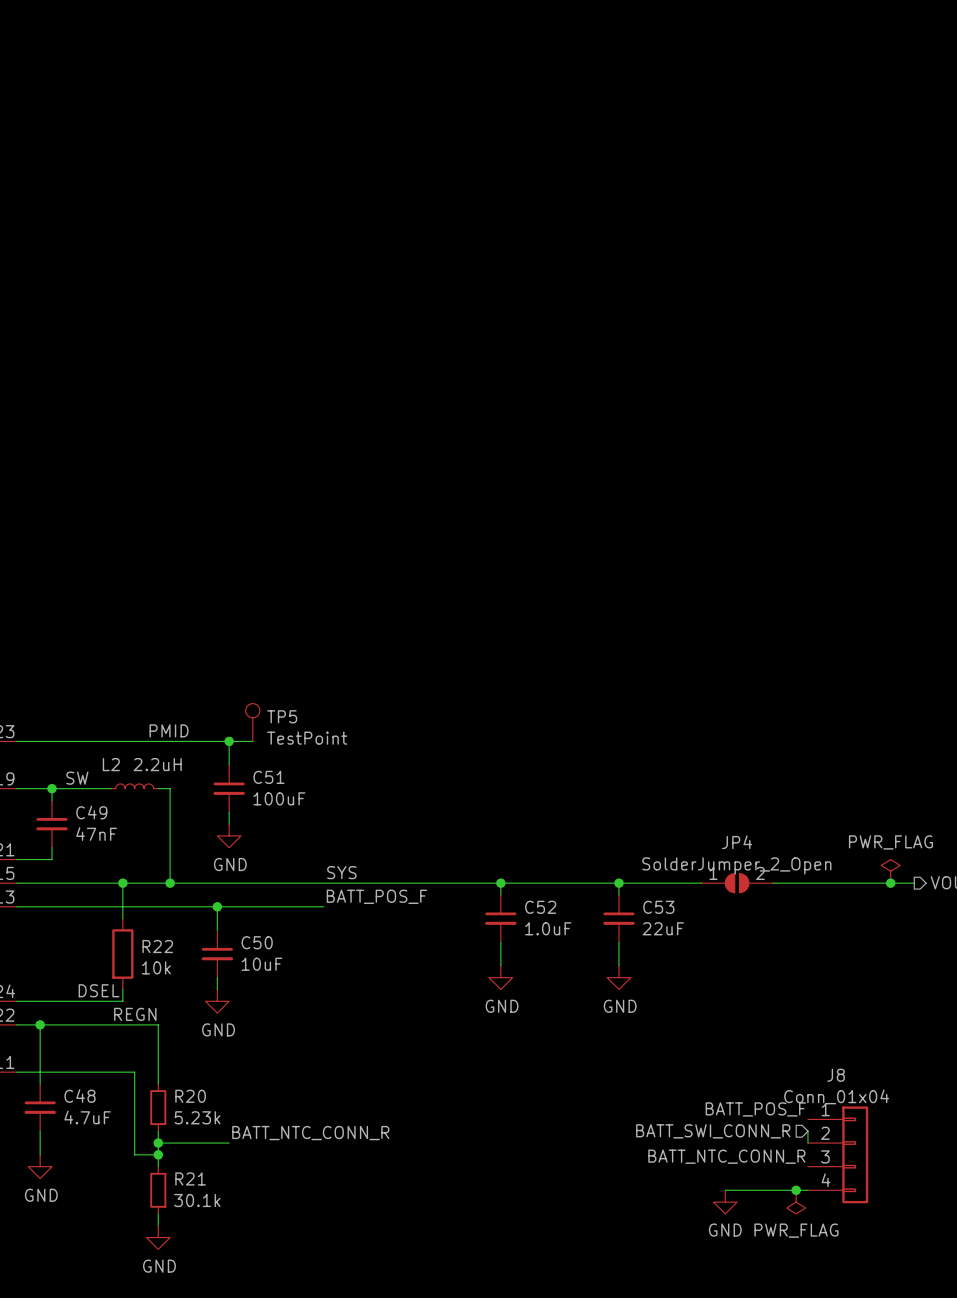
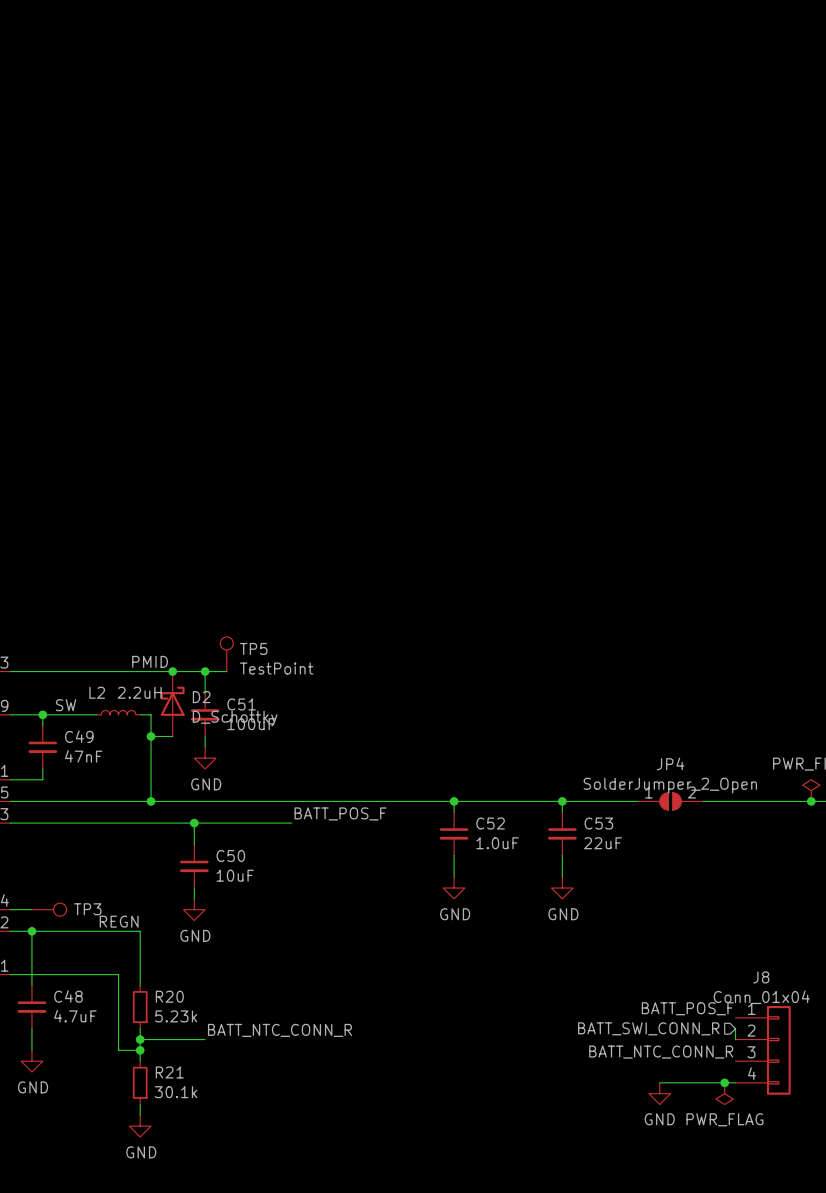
junction: none -> (172, 671)
D2: none -> D_Schottky (172, 704)
wire: none -> (151, 736) (172, 736)
junction: none -> (151, 736)
label: SYS (341, 872) -> none
wire: (122, 883) (122, 918) -> none
junction: (122, 883) -> none
R22: 10k (122, 954) -> none
wire: (122, 989) (122, 1001) (40, 1001) -> none
label: DSEL (99, 990) -> none
TP3: none -> (49, 909)

